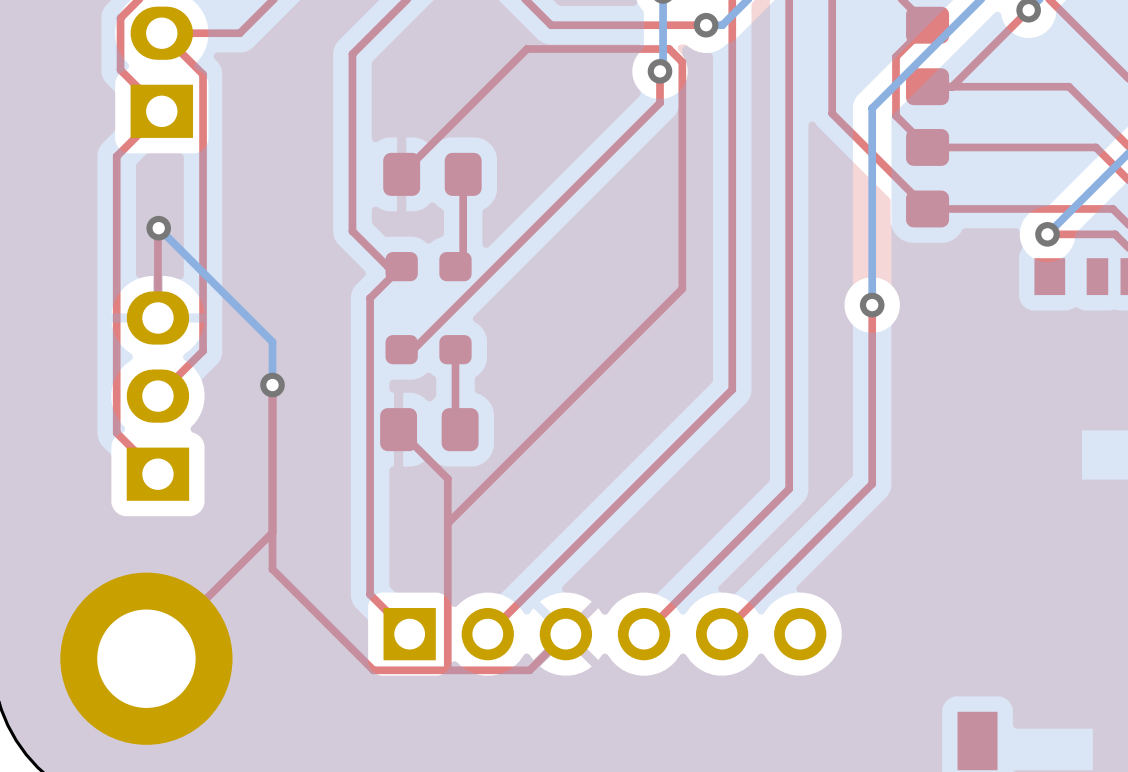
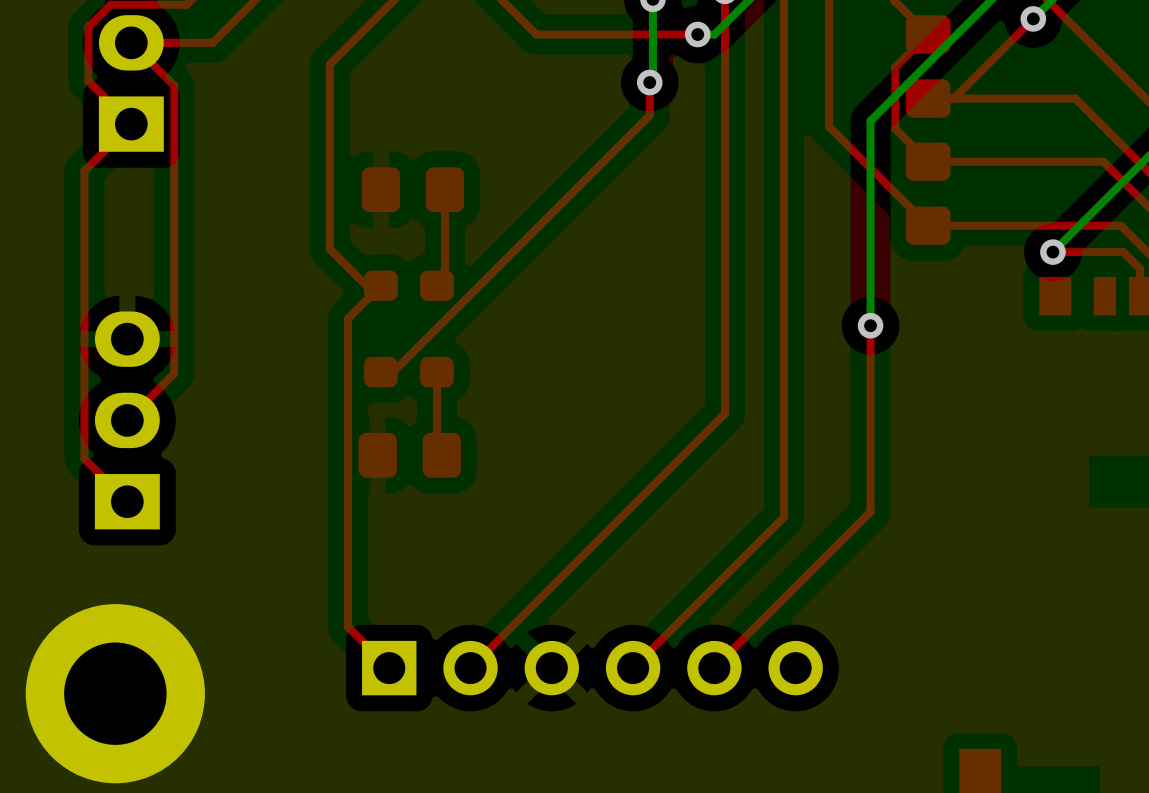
top track: (401, 174) (527, 49) (669, 49) (682, 62) (682, 288) (447, 523) -> none
top track: (158, 228) (157, 317) -> none
bottom track: (158, 228) (272, 341) (272, 385) -> none
via: (158, 228) -> none
top track: (272, 385) (272, 569) (373, 670) (529, 670) (565, 634) -> none
via: (272, 385) -> none
top track: (398, 429) (447, 478) (447, 670) -> none
top track: (272, 532) (146, 658) -> none

